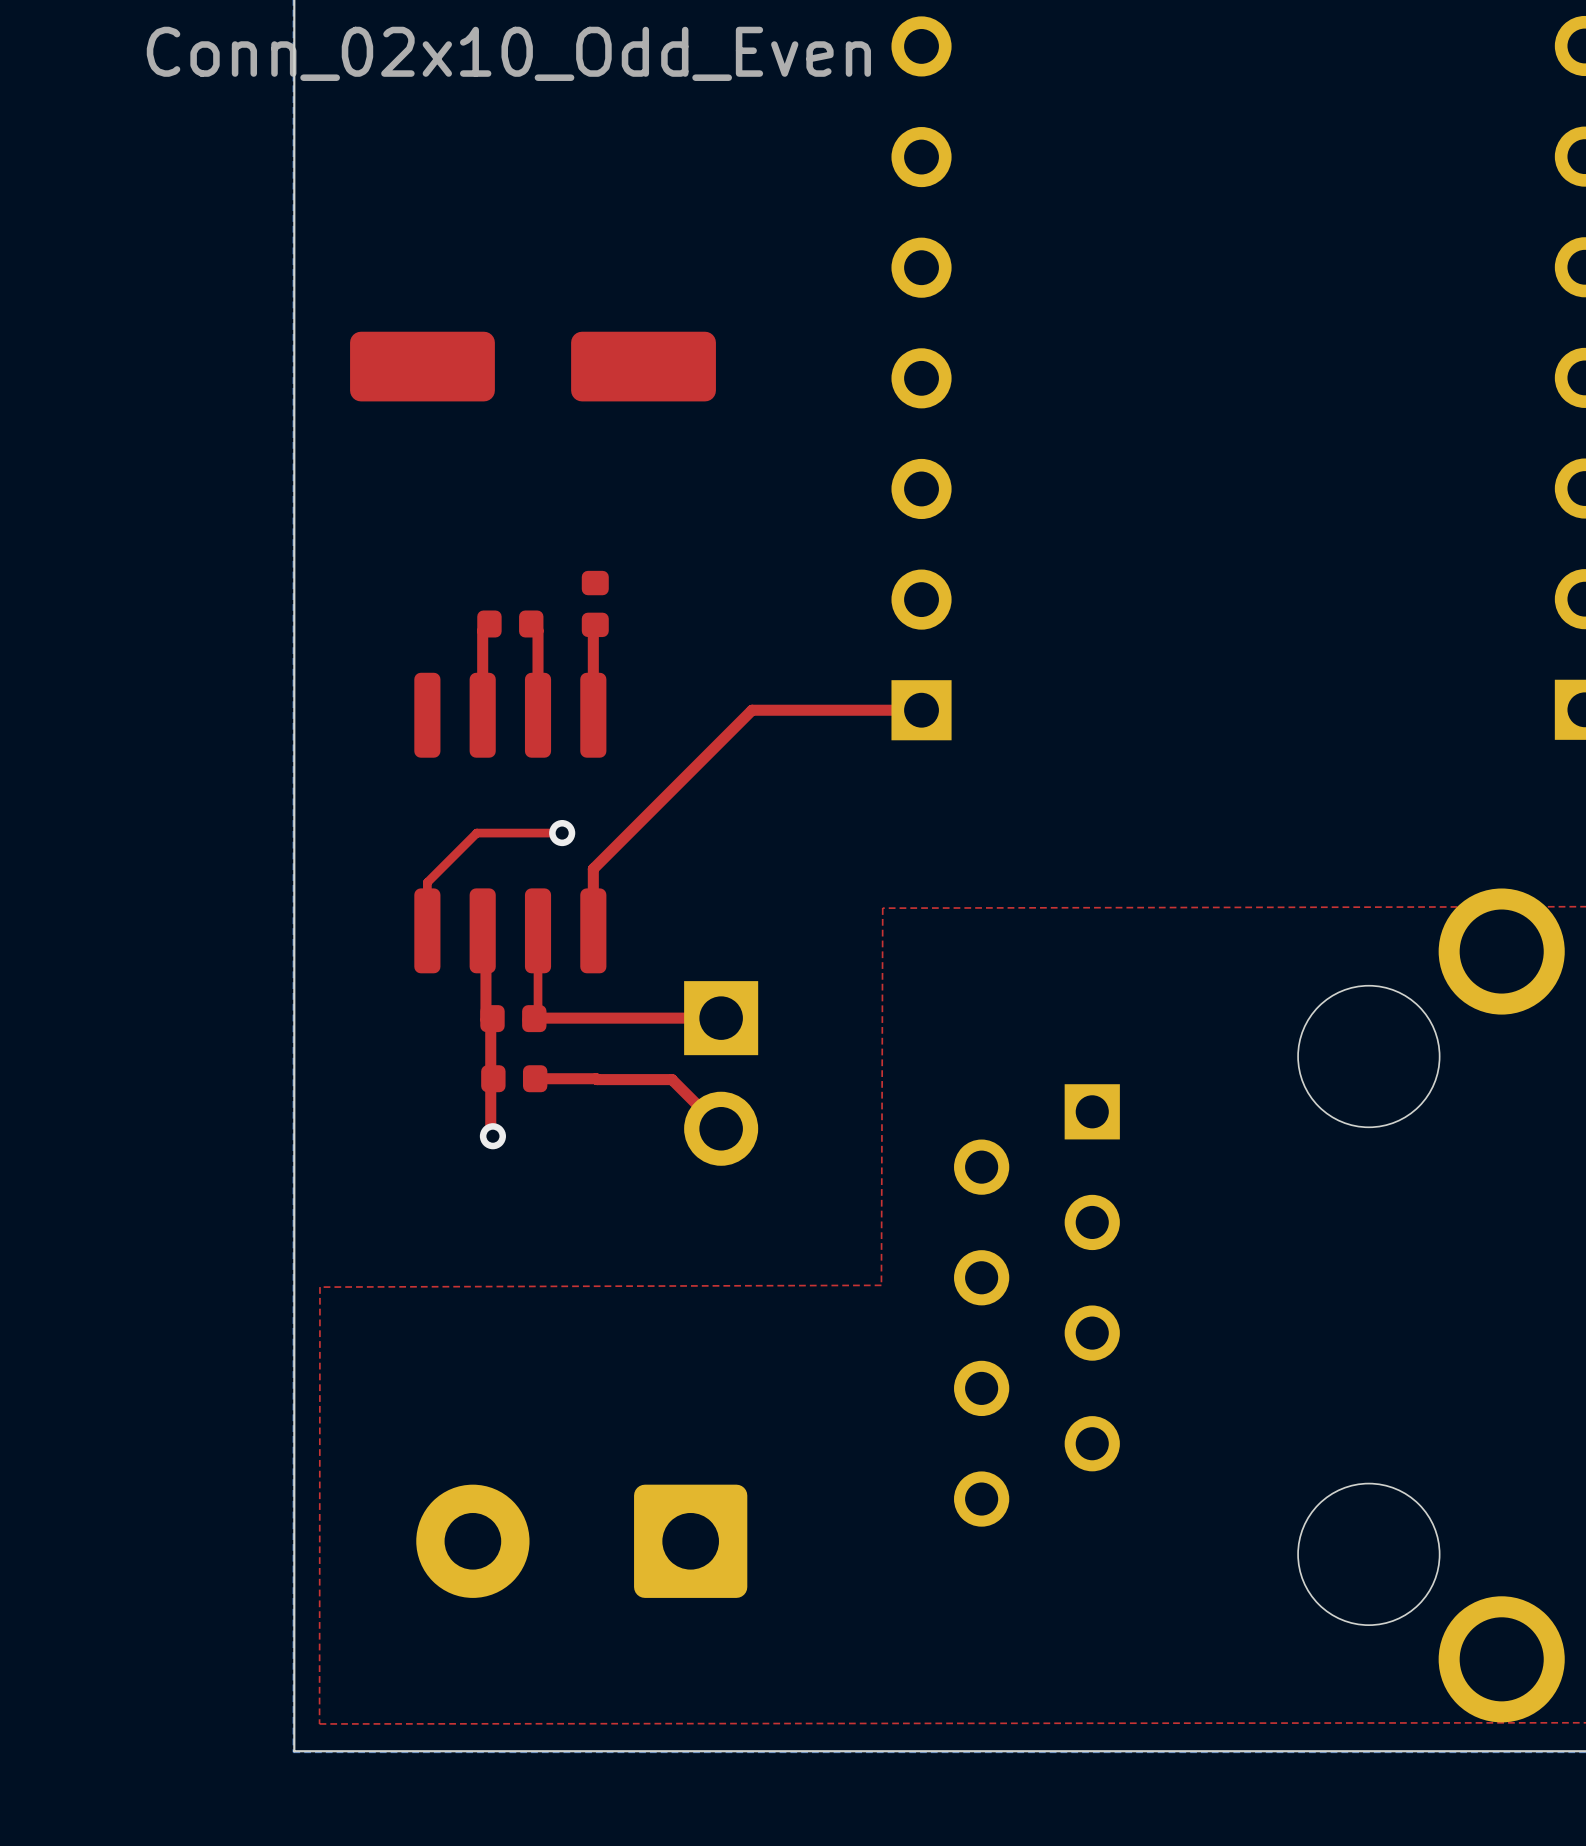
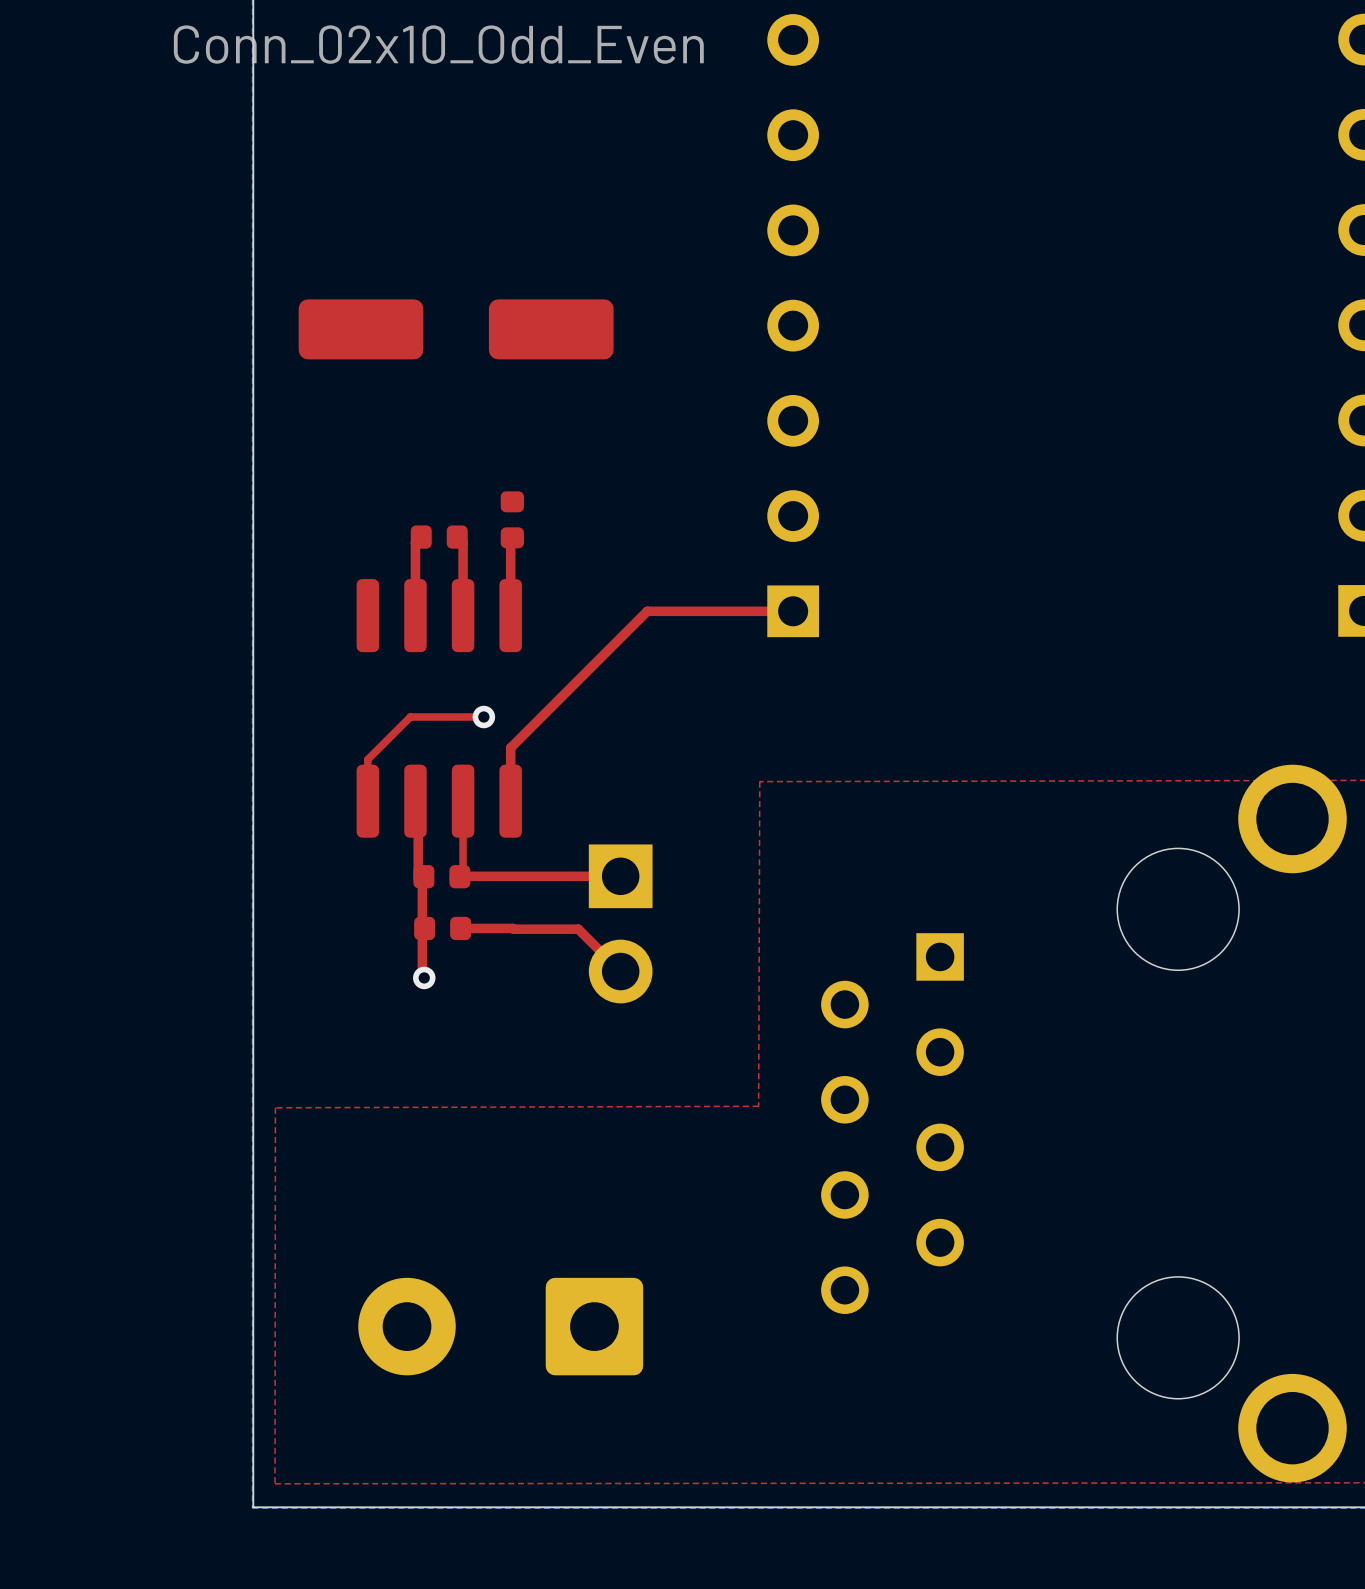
part position: (533, 366) -> (456, 329)

